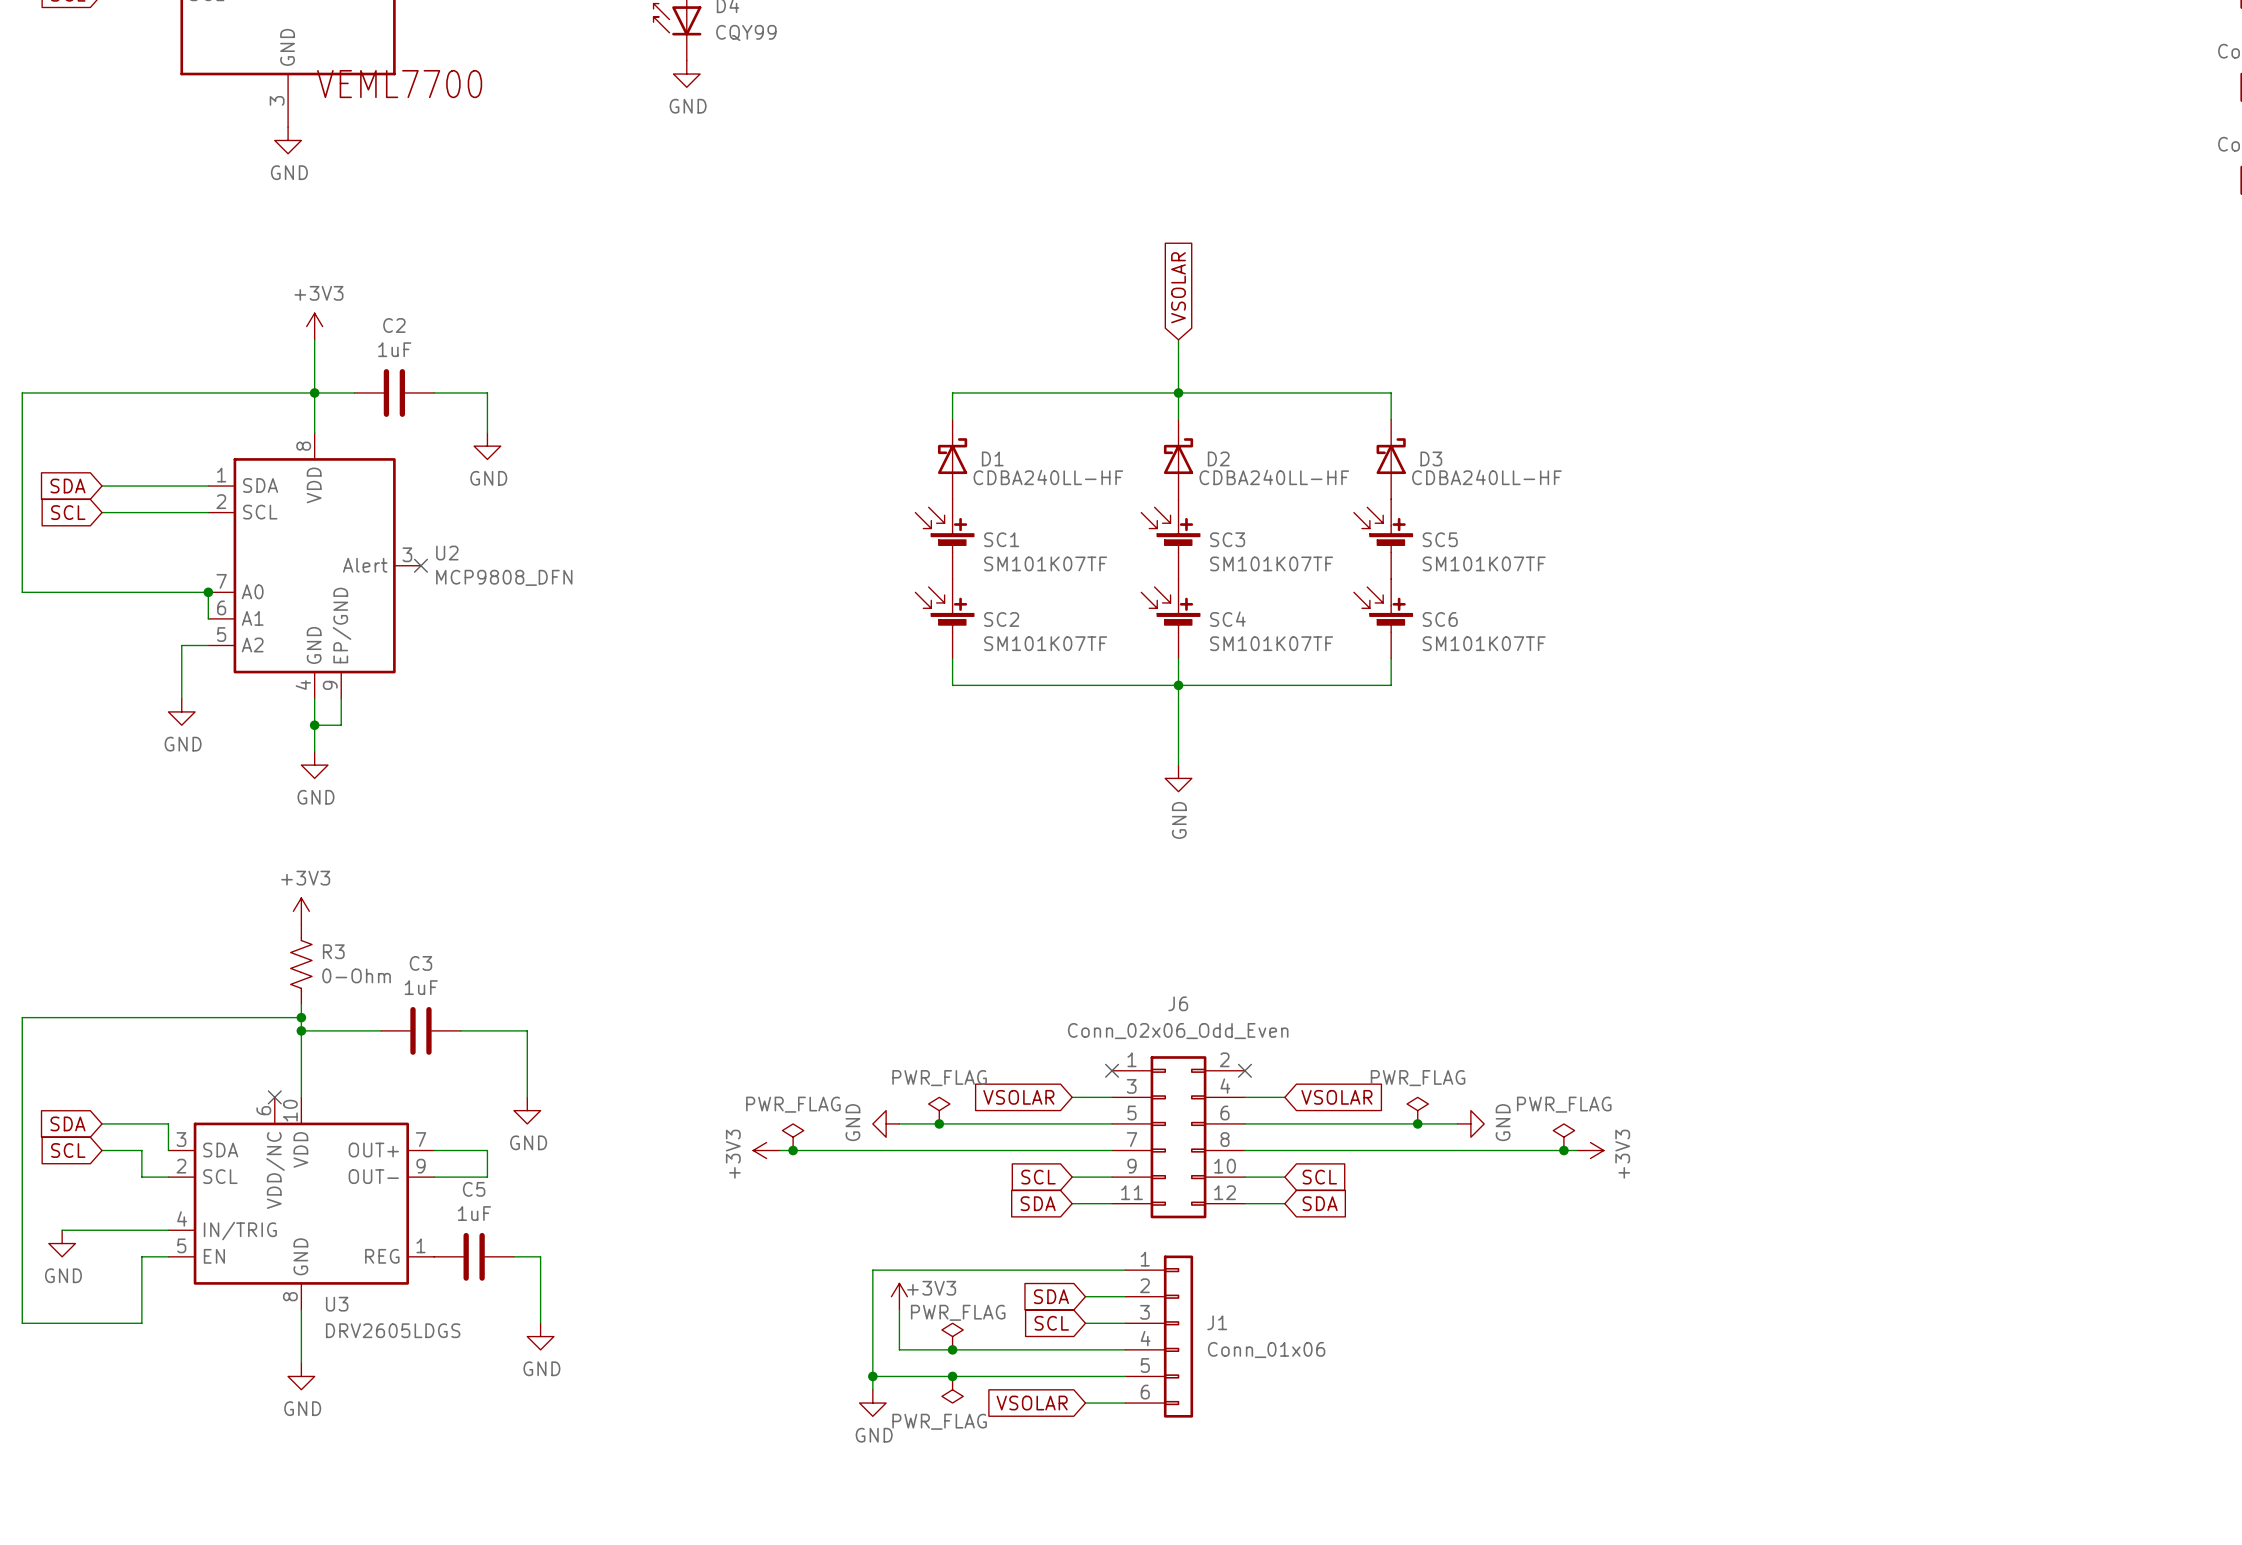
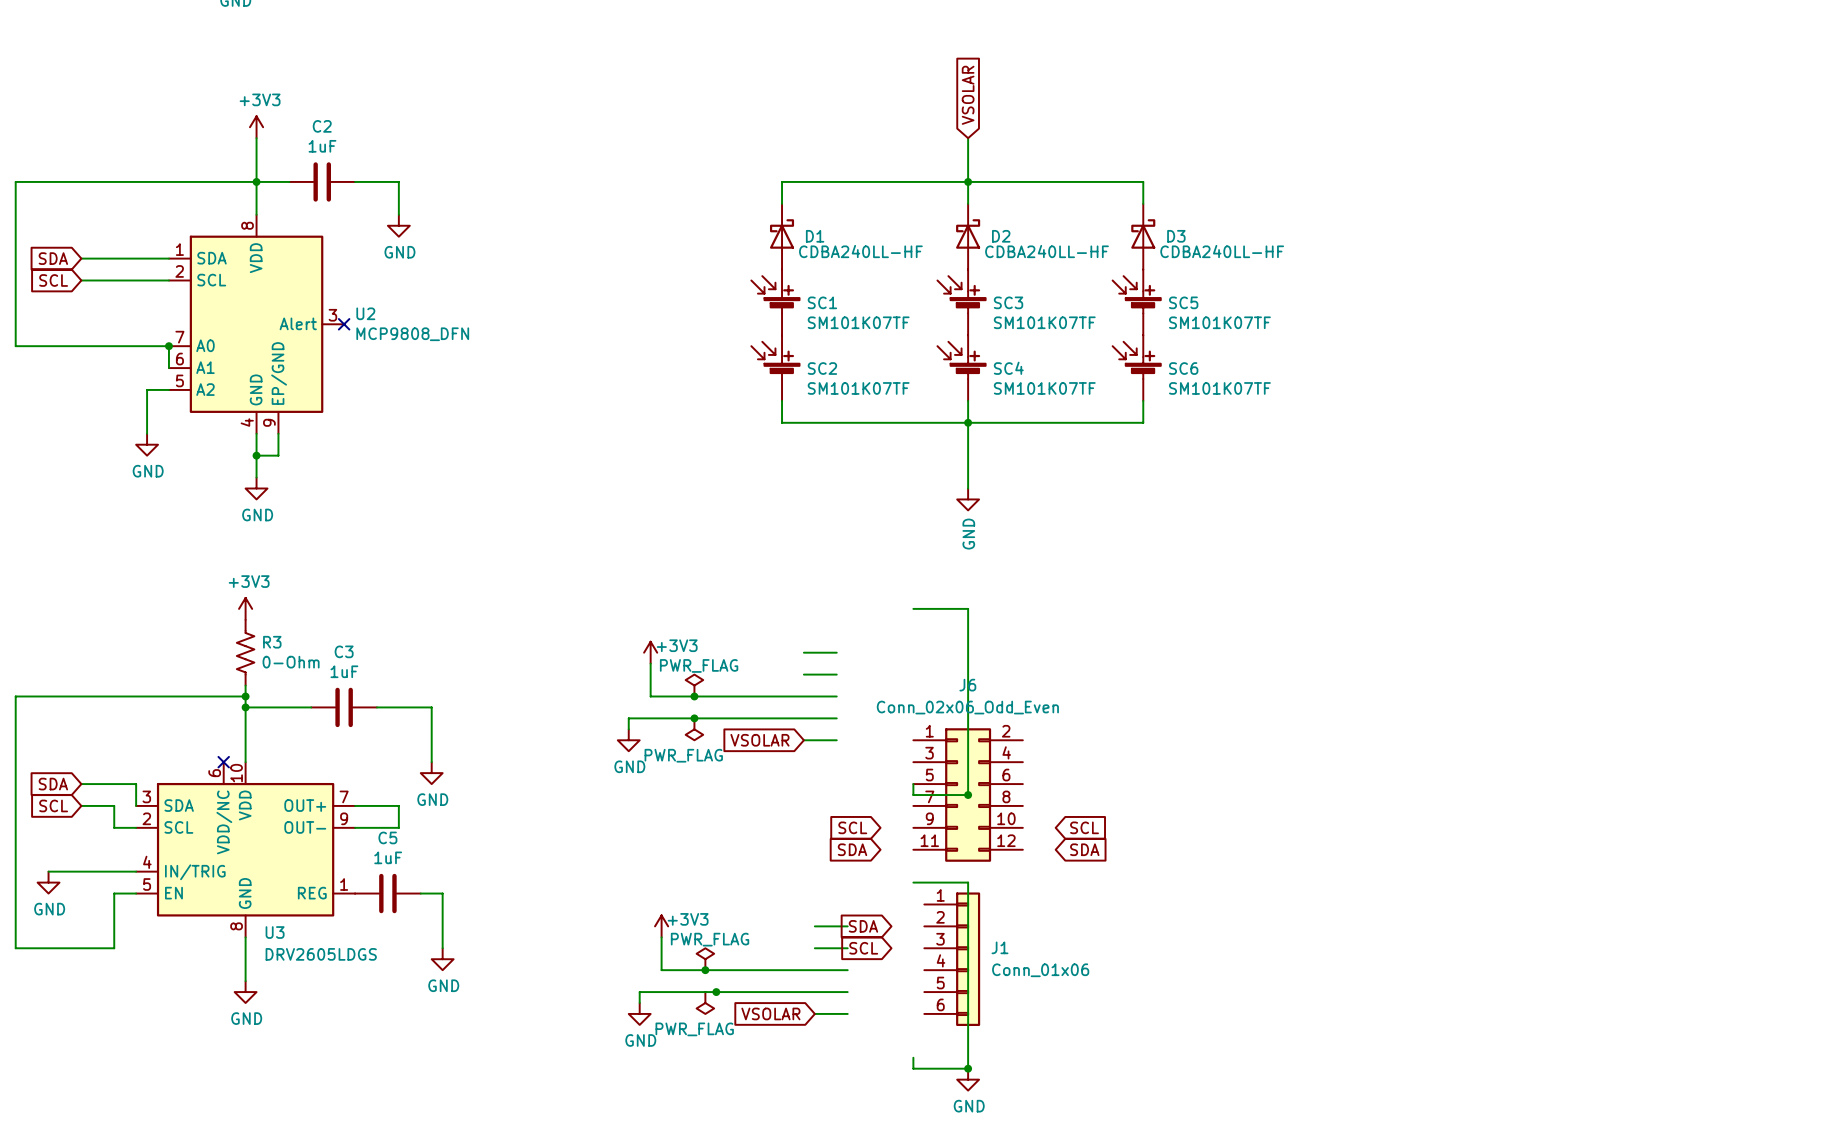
power symbol: none -> +3V3 (650, 652)
wire: none -> (650, 663) (650, 696) (836, 696)
power symbol: none -> PWR_FLAG (694, 685)
junction: none -> (694, 696)
junction: none -> (694, 718)
wire: none -> (836, 718) (628, 718) (628, 729)
power symbol: none -> PWR_FLAG (694, 729)
no-connect mark: (1112, 1070) -> none
no-connect mark: (1244, 1070) -> none
global label position: VSOLAR (1018, 1097) -> VSOLAR (759, 740)
wire: (1072, 1097) (1112, 1097) -> (803, 674) (836, 674)
wire: (1244, 1097) (1284, 1097) -> none
global label: VSOLAR (1336, 1097) -> none
power symbol: PWR_FLAG (939, 1110) -> none
power symbol: PWR_FLAG (1417, 1110) -> none
power symbol rotation: 0° (886, 1123) -> 90° counterclockwise (628, 740)
power symbol position: GND (886, 1123) -> GND (628, 740)
wire: (899, 1123) (1112, 1123) -> (913, 608) (968, 608) (968, 795) (913, 795) (913, 784)
junction: (939, 1123) -> none
wire: (1244, 1123) (1457, 1123) -> none
junction: (1417, 1123) -> none
power symbol: GND (1470, 1123) -> none
power symbol: PWR_FLAG (793, 1137) -> none
junction: none -> (968, 795)
power symbol: PWR_FLAG (1563, 1137) -> none
power symbol: +3V3 (766, 1150) -> none
wire: (779, 1150) (1112, 1150) -> none
junction: (793, 1150) -> none
wire: (1244, 1150) (1577, 1150) -> none
junction: (1563, 1150) -> none
power symbol: +3V3 (1590, 1150) -> none
wire: (1072, 1177) (1112, 1177) -> (803, 740) (836, 740)
wire: (1244, 1177) (1284, 1177) -> none
wire: (1072, 1203) (1112, 1203) -> (803, 652) (836, 652)
wire: (1244, 1203) (1284, 1203) -> none
wire: none -> (913, 882) (968, 882) (968, 1068) (913, 1068) (913, 1057)
wire: (1125, 1270) (872, 1270) (872, 1389) -> none
power symbol: none -> +3V3 (661, 926)
power symbol: +3V3 (899, 1296) -> none
wire: (1085, 1296) (1125, 1296) -> (814, 926) (847, 926)
wire: (899, 1310) (899, 1349) -> (661, 937) (661, 970) (738, 970)
wire: (1085, 1323) (1125, 1323) -> (814, 948) (847, 948)
power symbol: none -> PWR_FLAG (705, 959)
power symbol: PWR_FLAG (952, 1336) -> none
junction: none -> (705, 970)
junction: (952, 1349) -> none
wire: (1032, 1349) (1125, 1349) -> none
wire: none -> (716, 992) (639, 992) (639, 1003)
junction: (952, 1376) -> none
wire: (1032, 1376) (1125, 1376) -> none
power symbol: none -> PWR_FLAG (705, 1003)
power symbol: PWR_FLAG (952, 1389) -> none
power symbol position: GND (872, 1403) -> GND (639, 1013)
global label position: VSOLAR (1032, 1403) -> VSOLAR (770, 1013)
wire: (1085, 1403) (1125, 1403) -> (814, 1013) (847, 1013)
junction: none -> (968, 1068)
power symbol: none -> GND (968, 1079)

